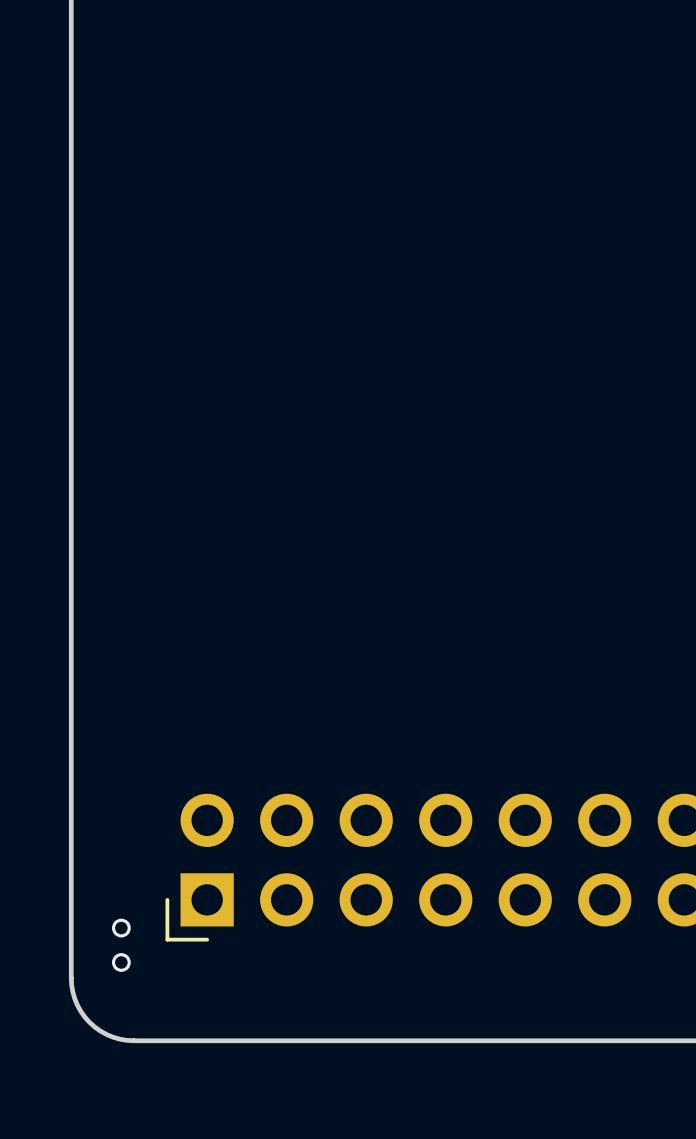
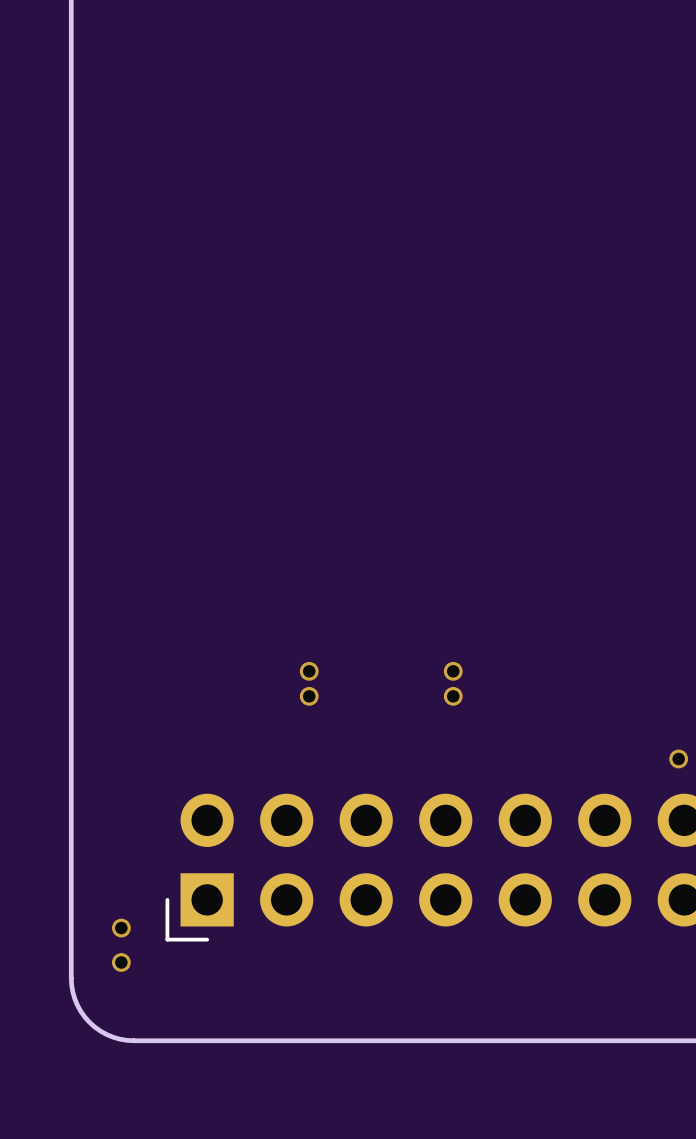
via: none -> (309, 671)
via: none -> (453, 671)
via: none -> (309, 696)
via: none -> (453, 696)
via: none -> (678, 758)

